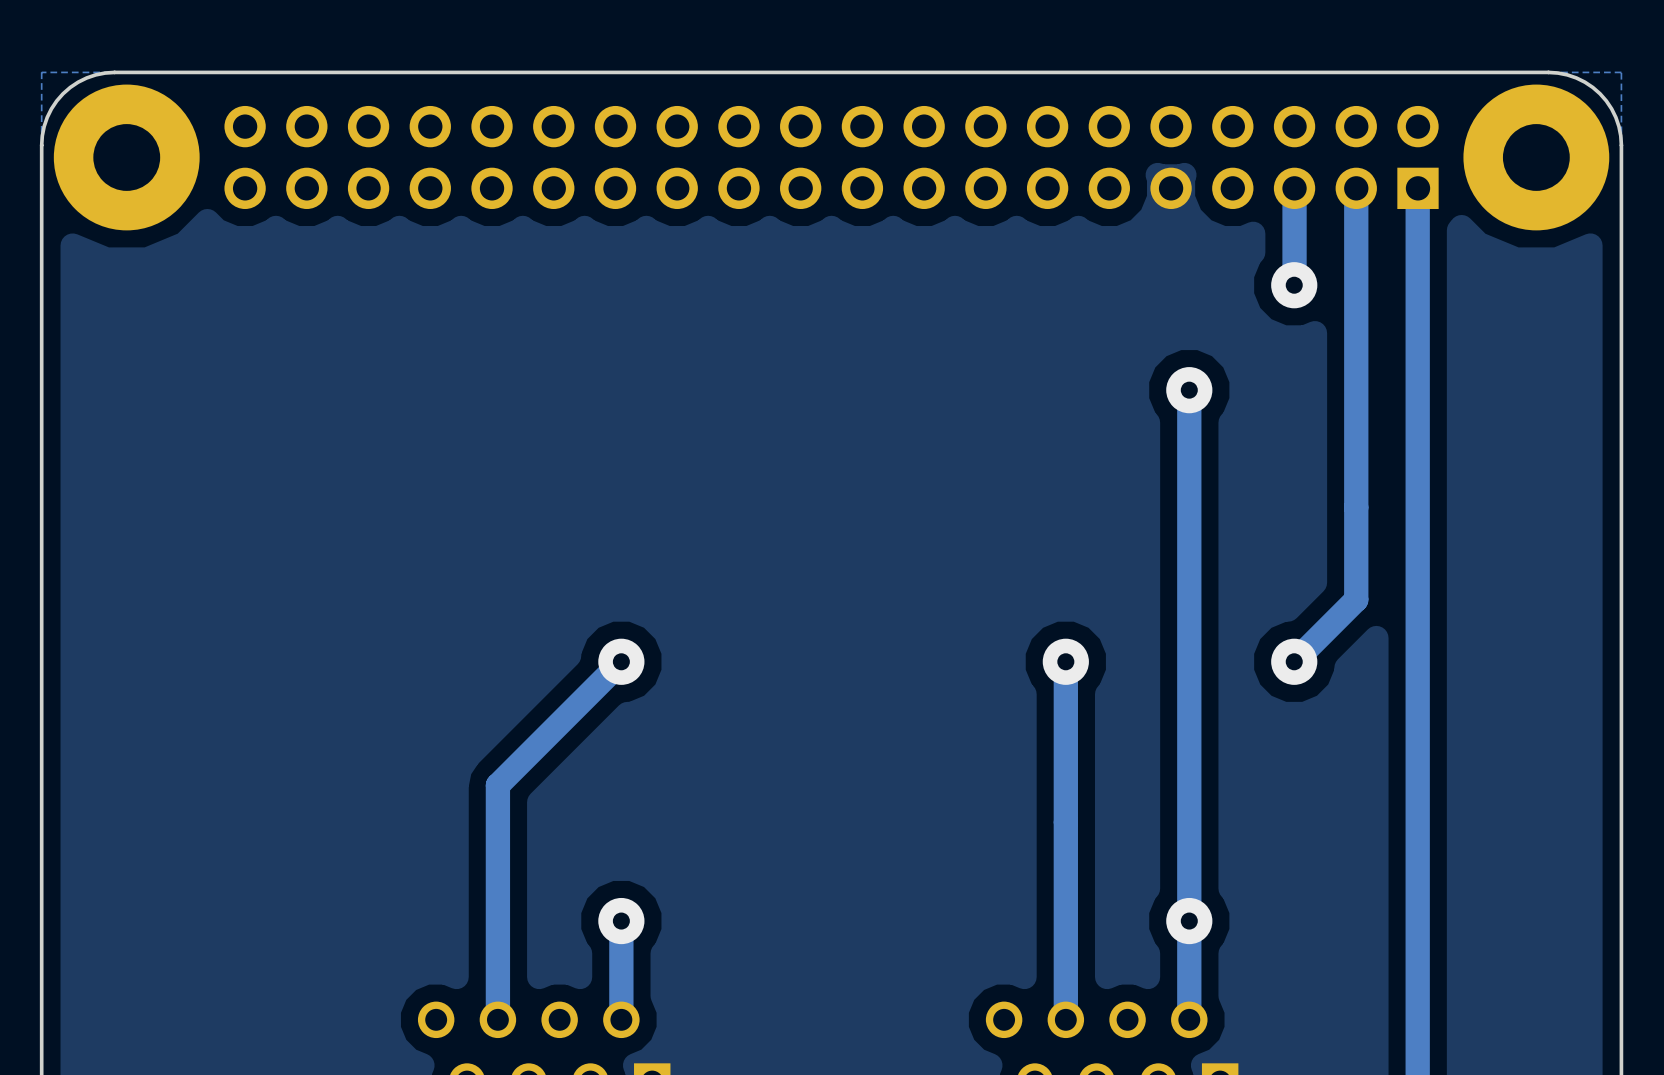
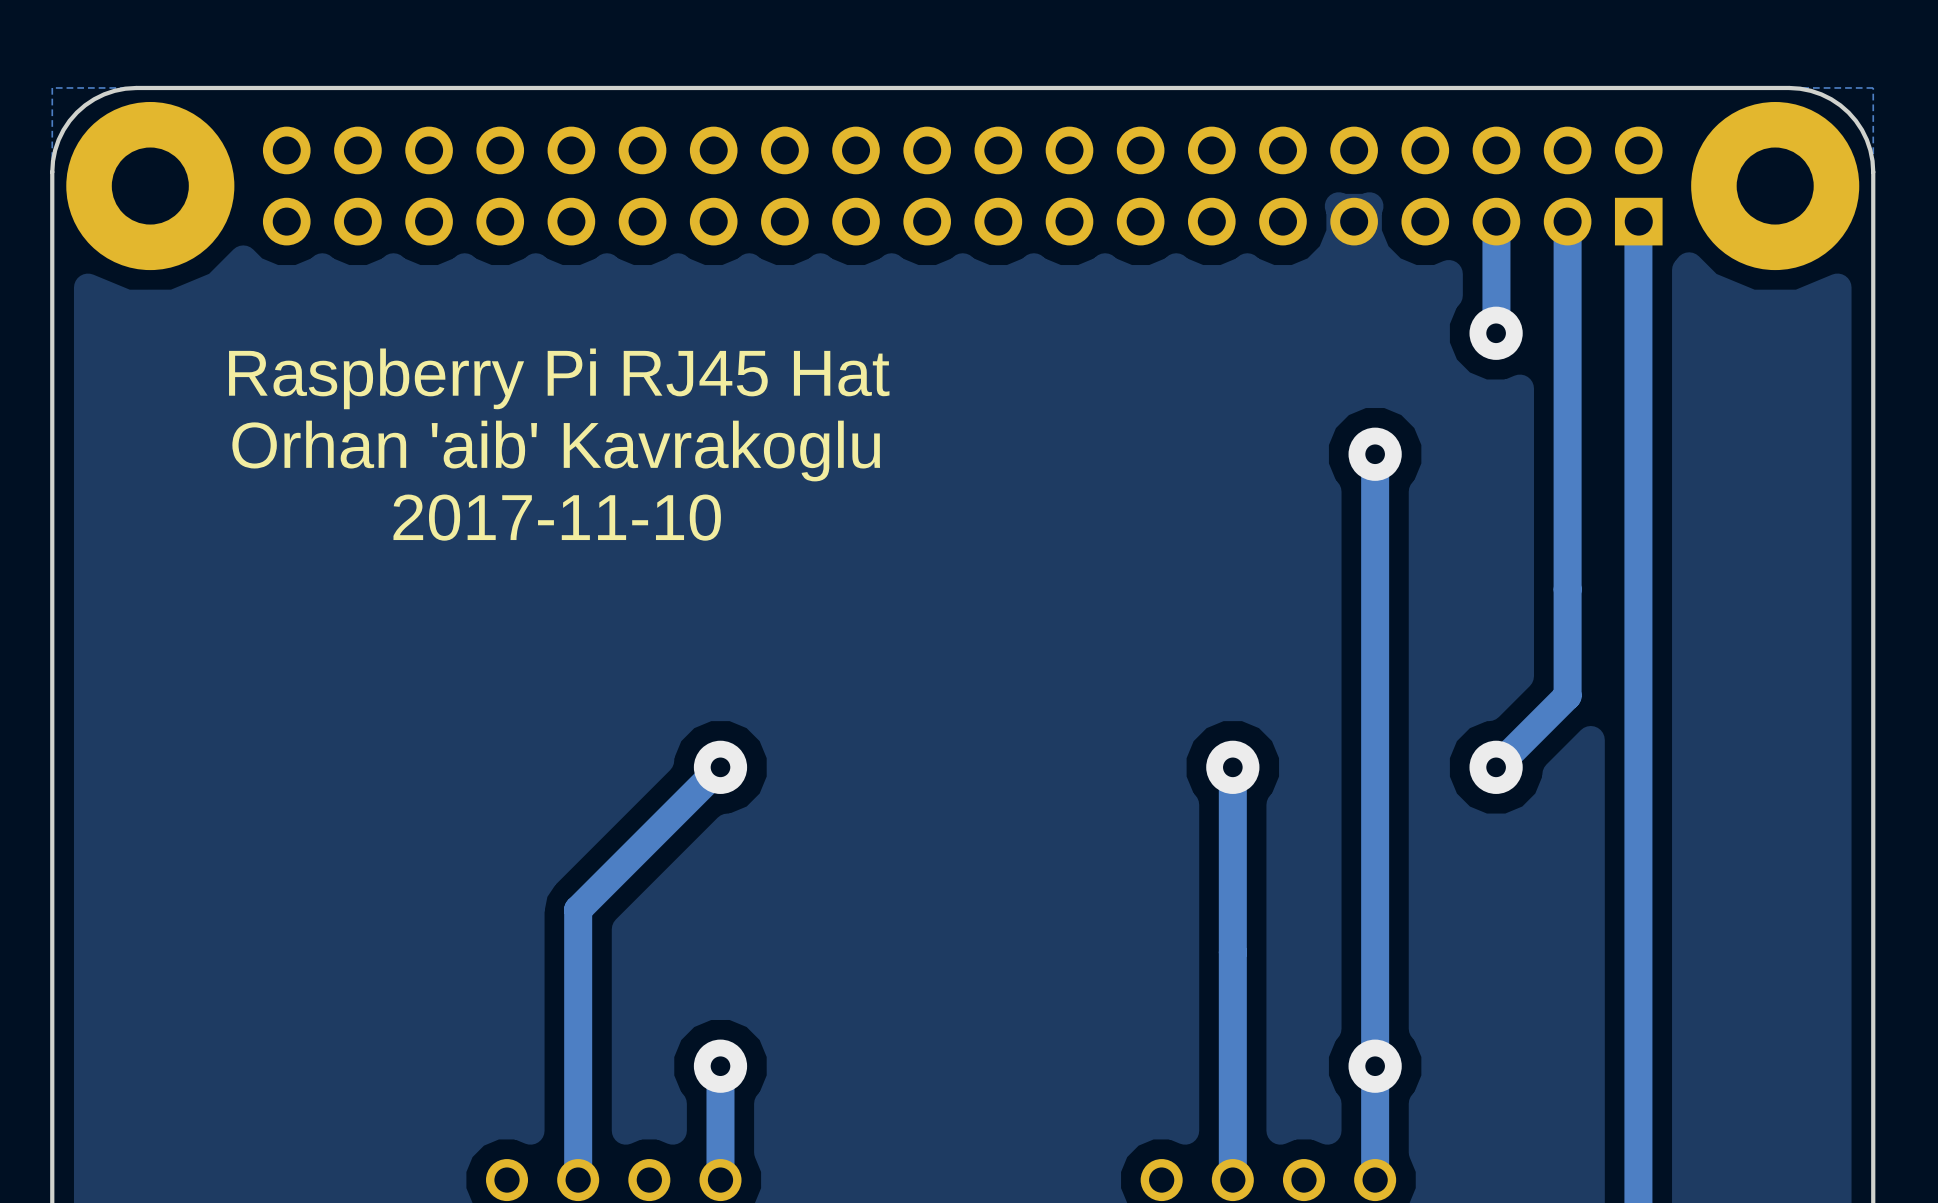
text: none -> Raspberry Pi RJ45 Hat (559, 378)
text: none -> Orhan 'aib' Kavrakoglu (556, 451)
text: none -> 2017-11-10 (557, 517)

